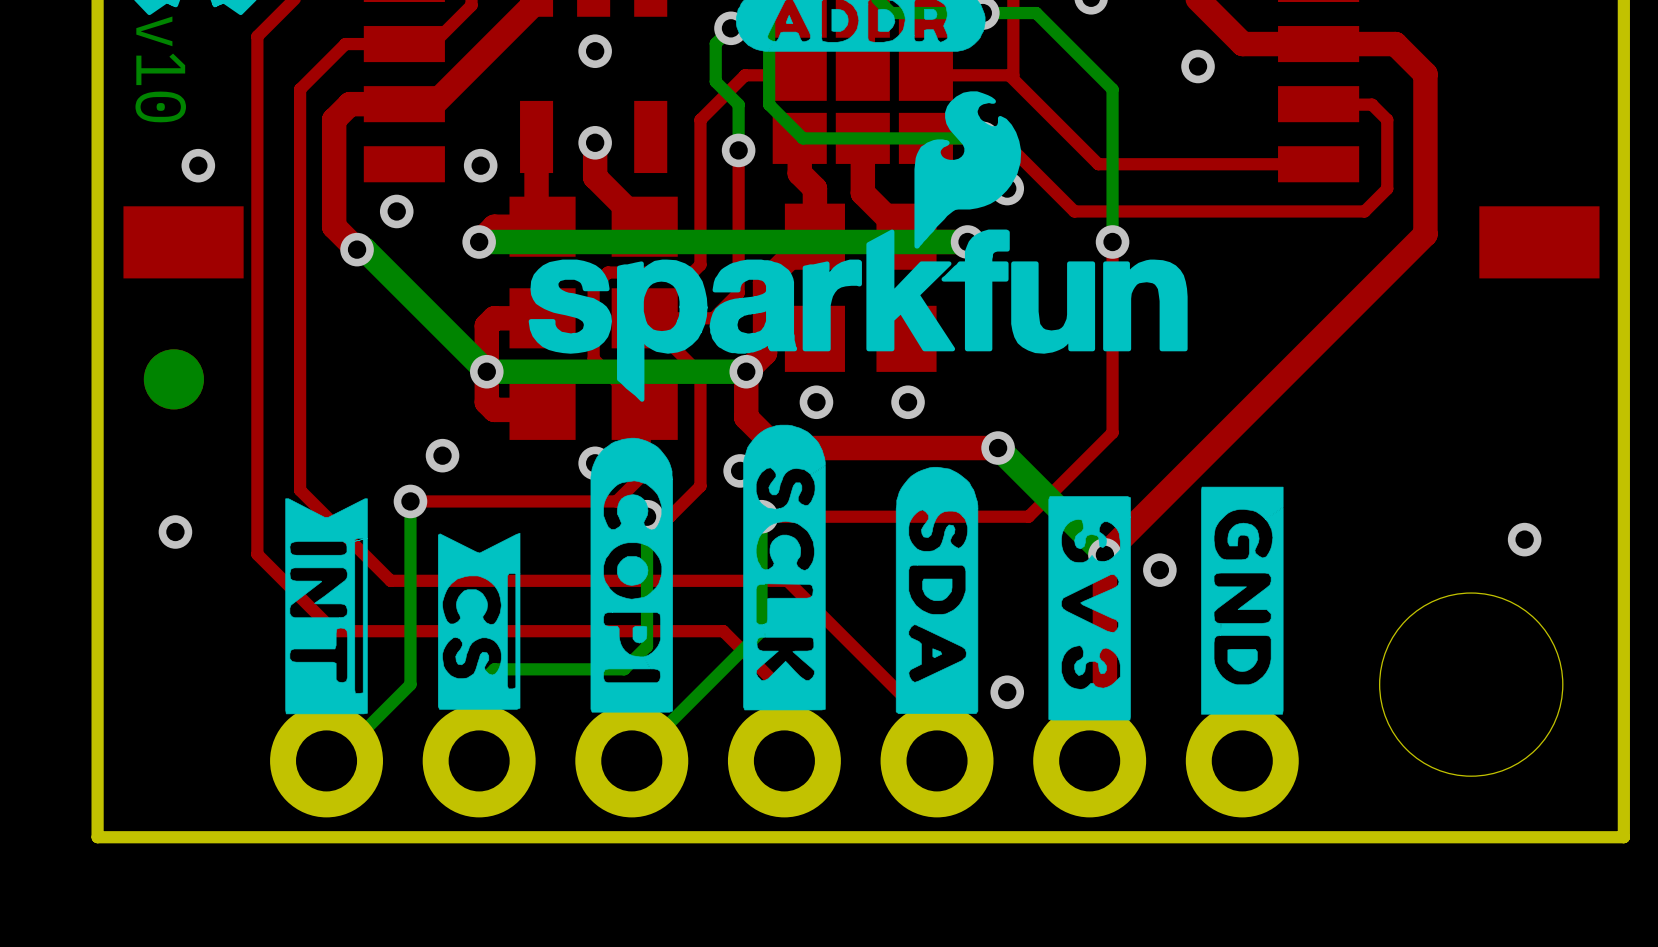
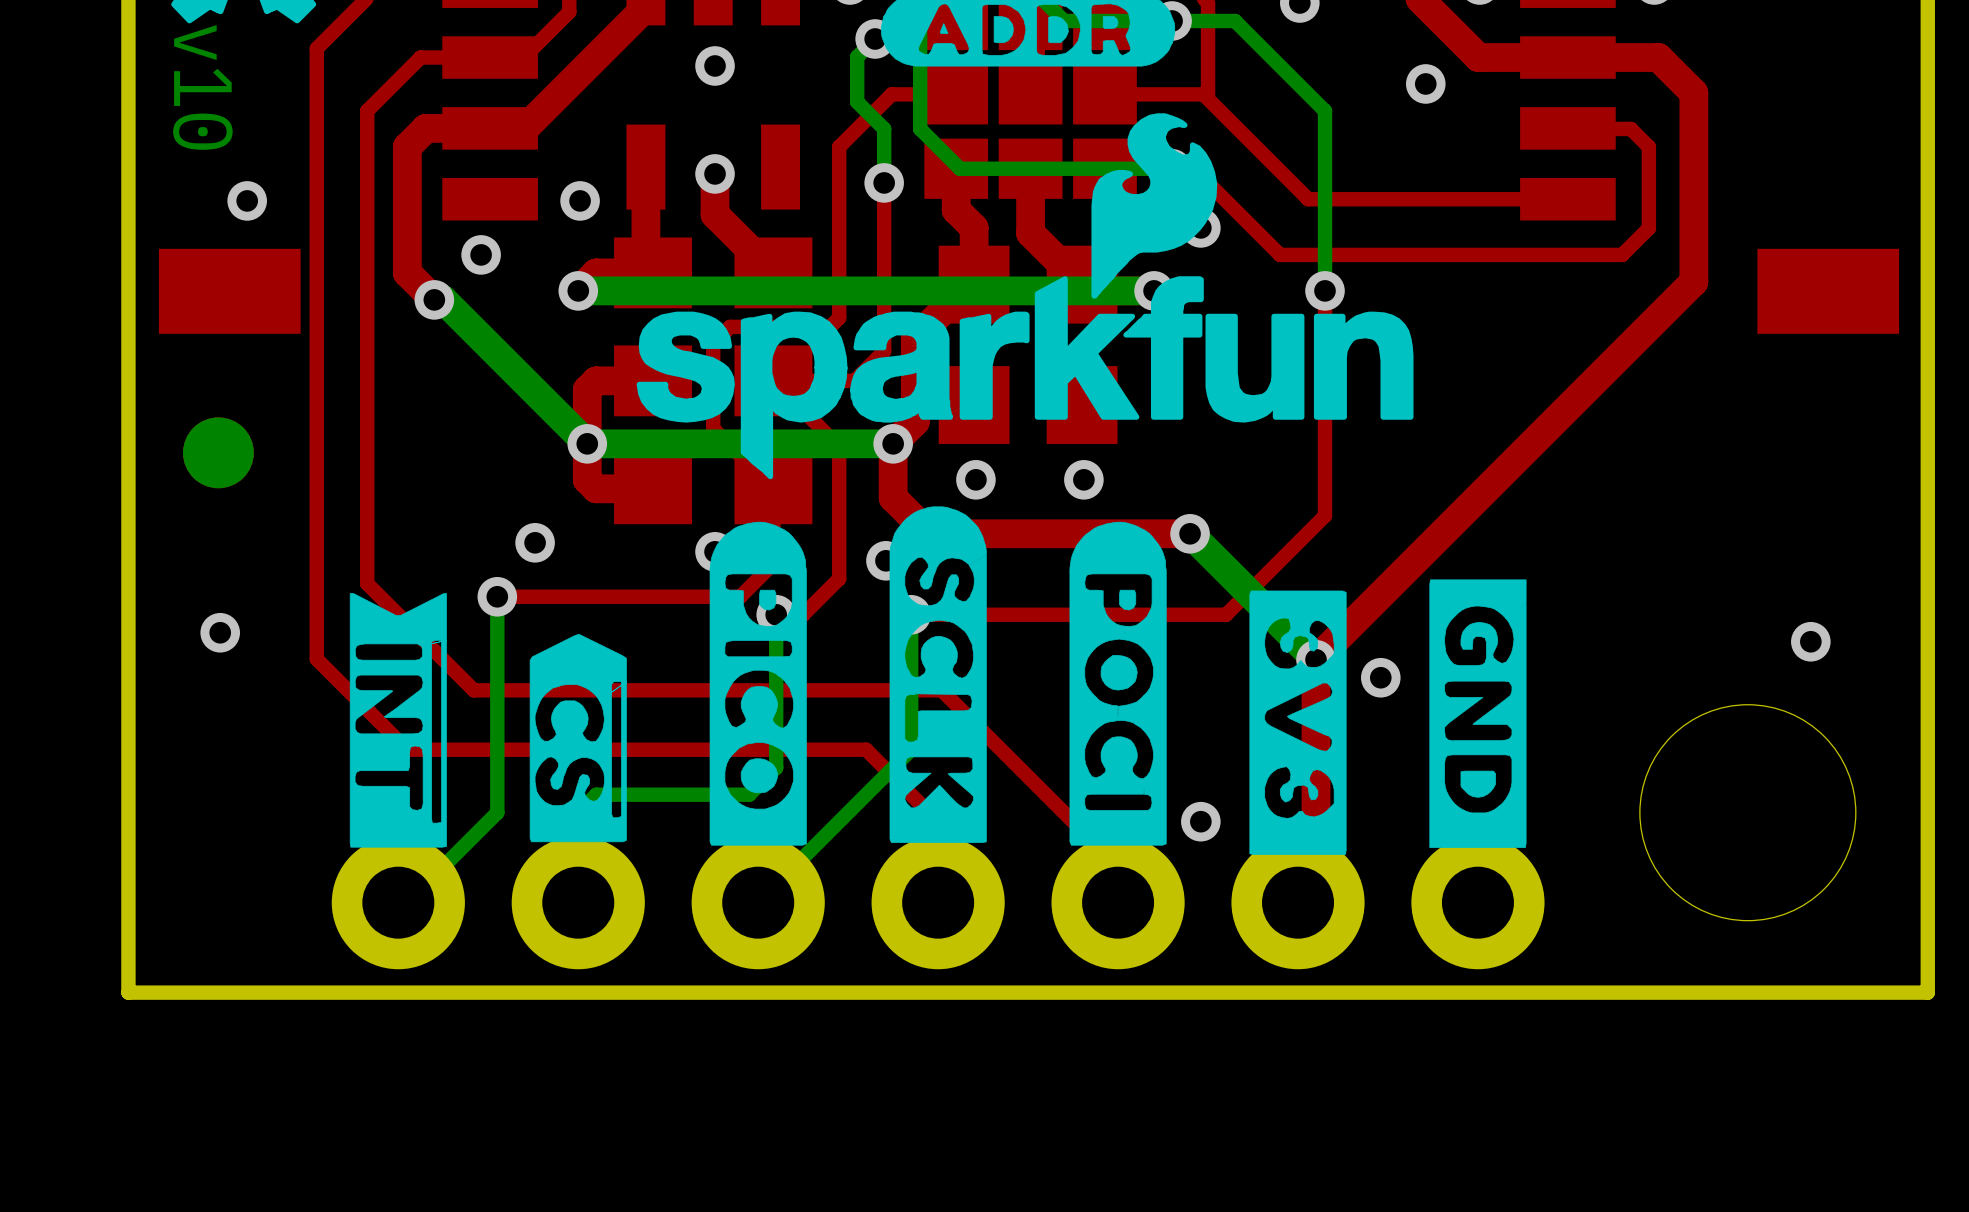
drawing shape: [590, 437, 673, 713] -> [709, 521, 807, 846]
drawing shape: [895, 466, 979, 714] -> [1069, 521, 1167, 846]
drawing shape: [438, 532, 521, 710] -> [529, 633, 627, 843]

